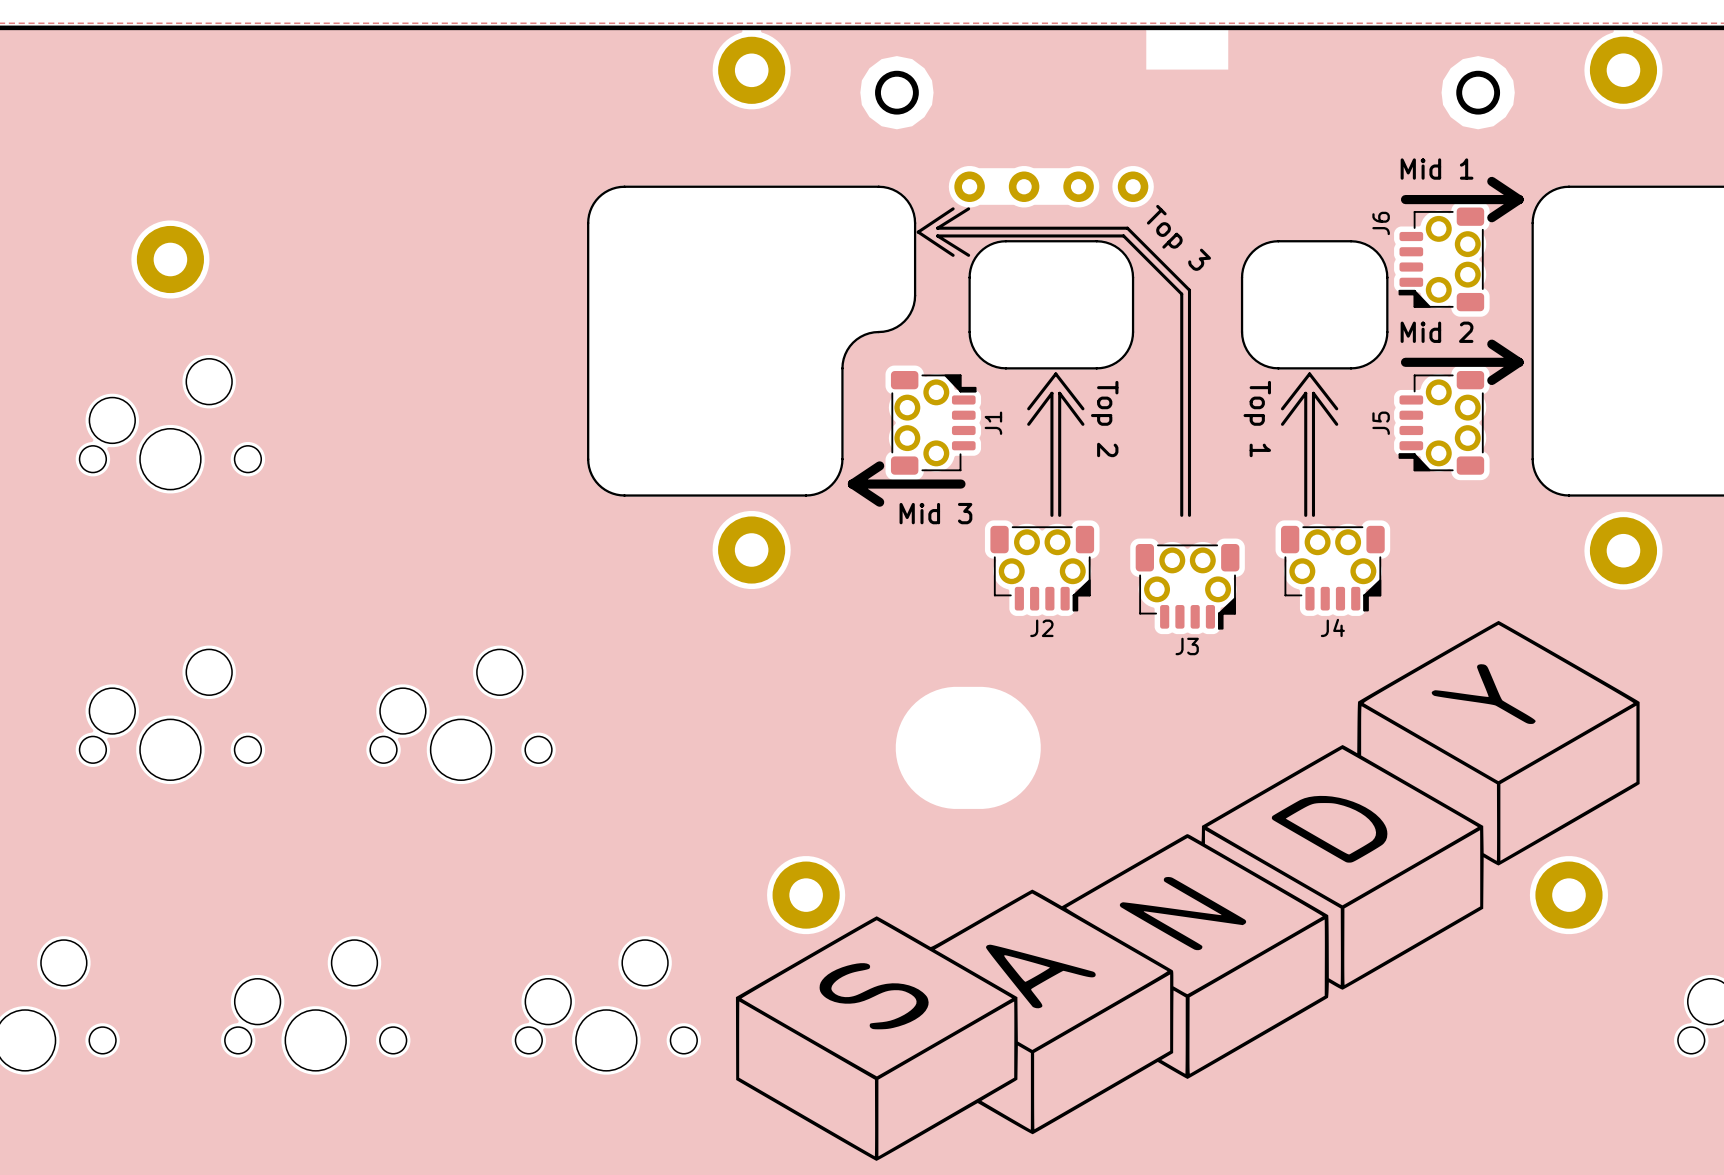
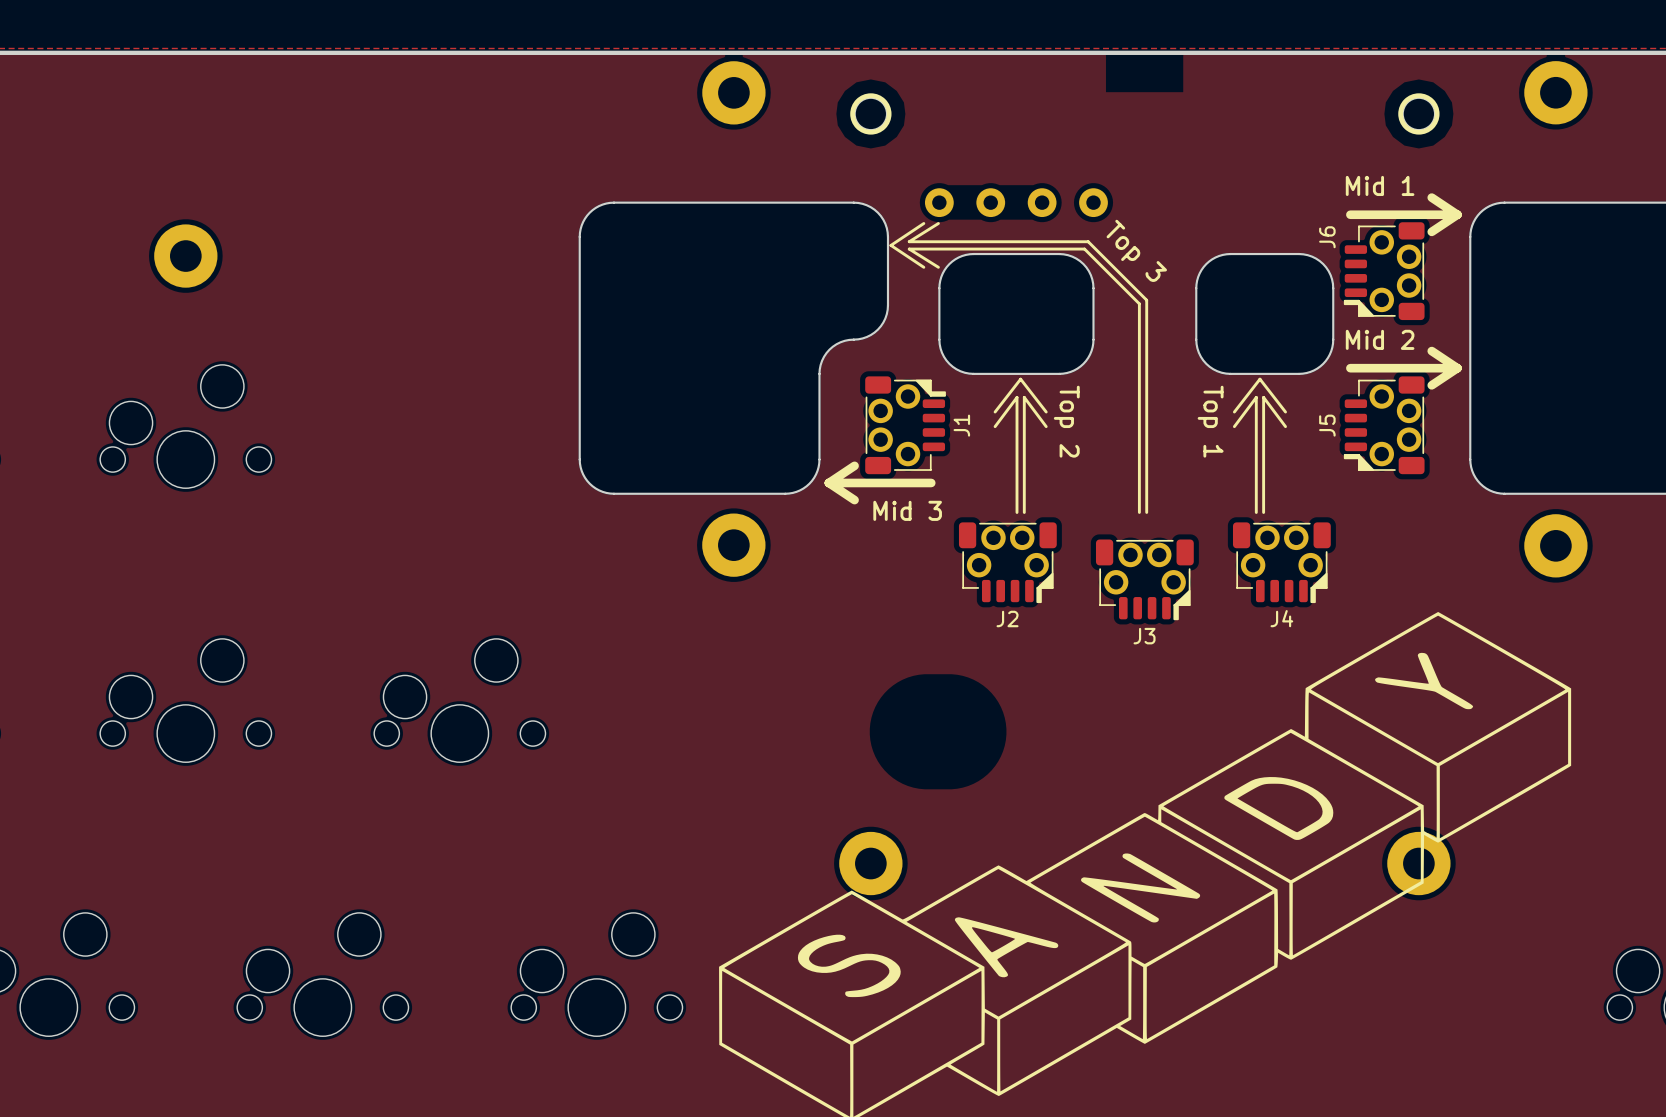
part position: (170, 259) -> (185, 256)
part position: (806, 895) -> (870, 863)
part position: (1568, 895) -> (1418, 863)

